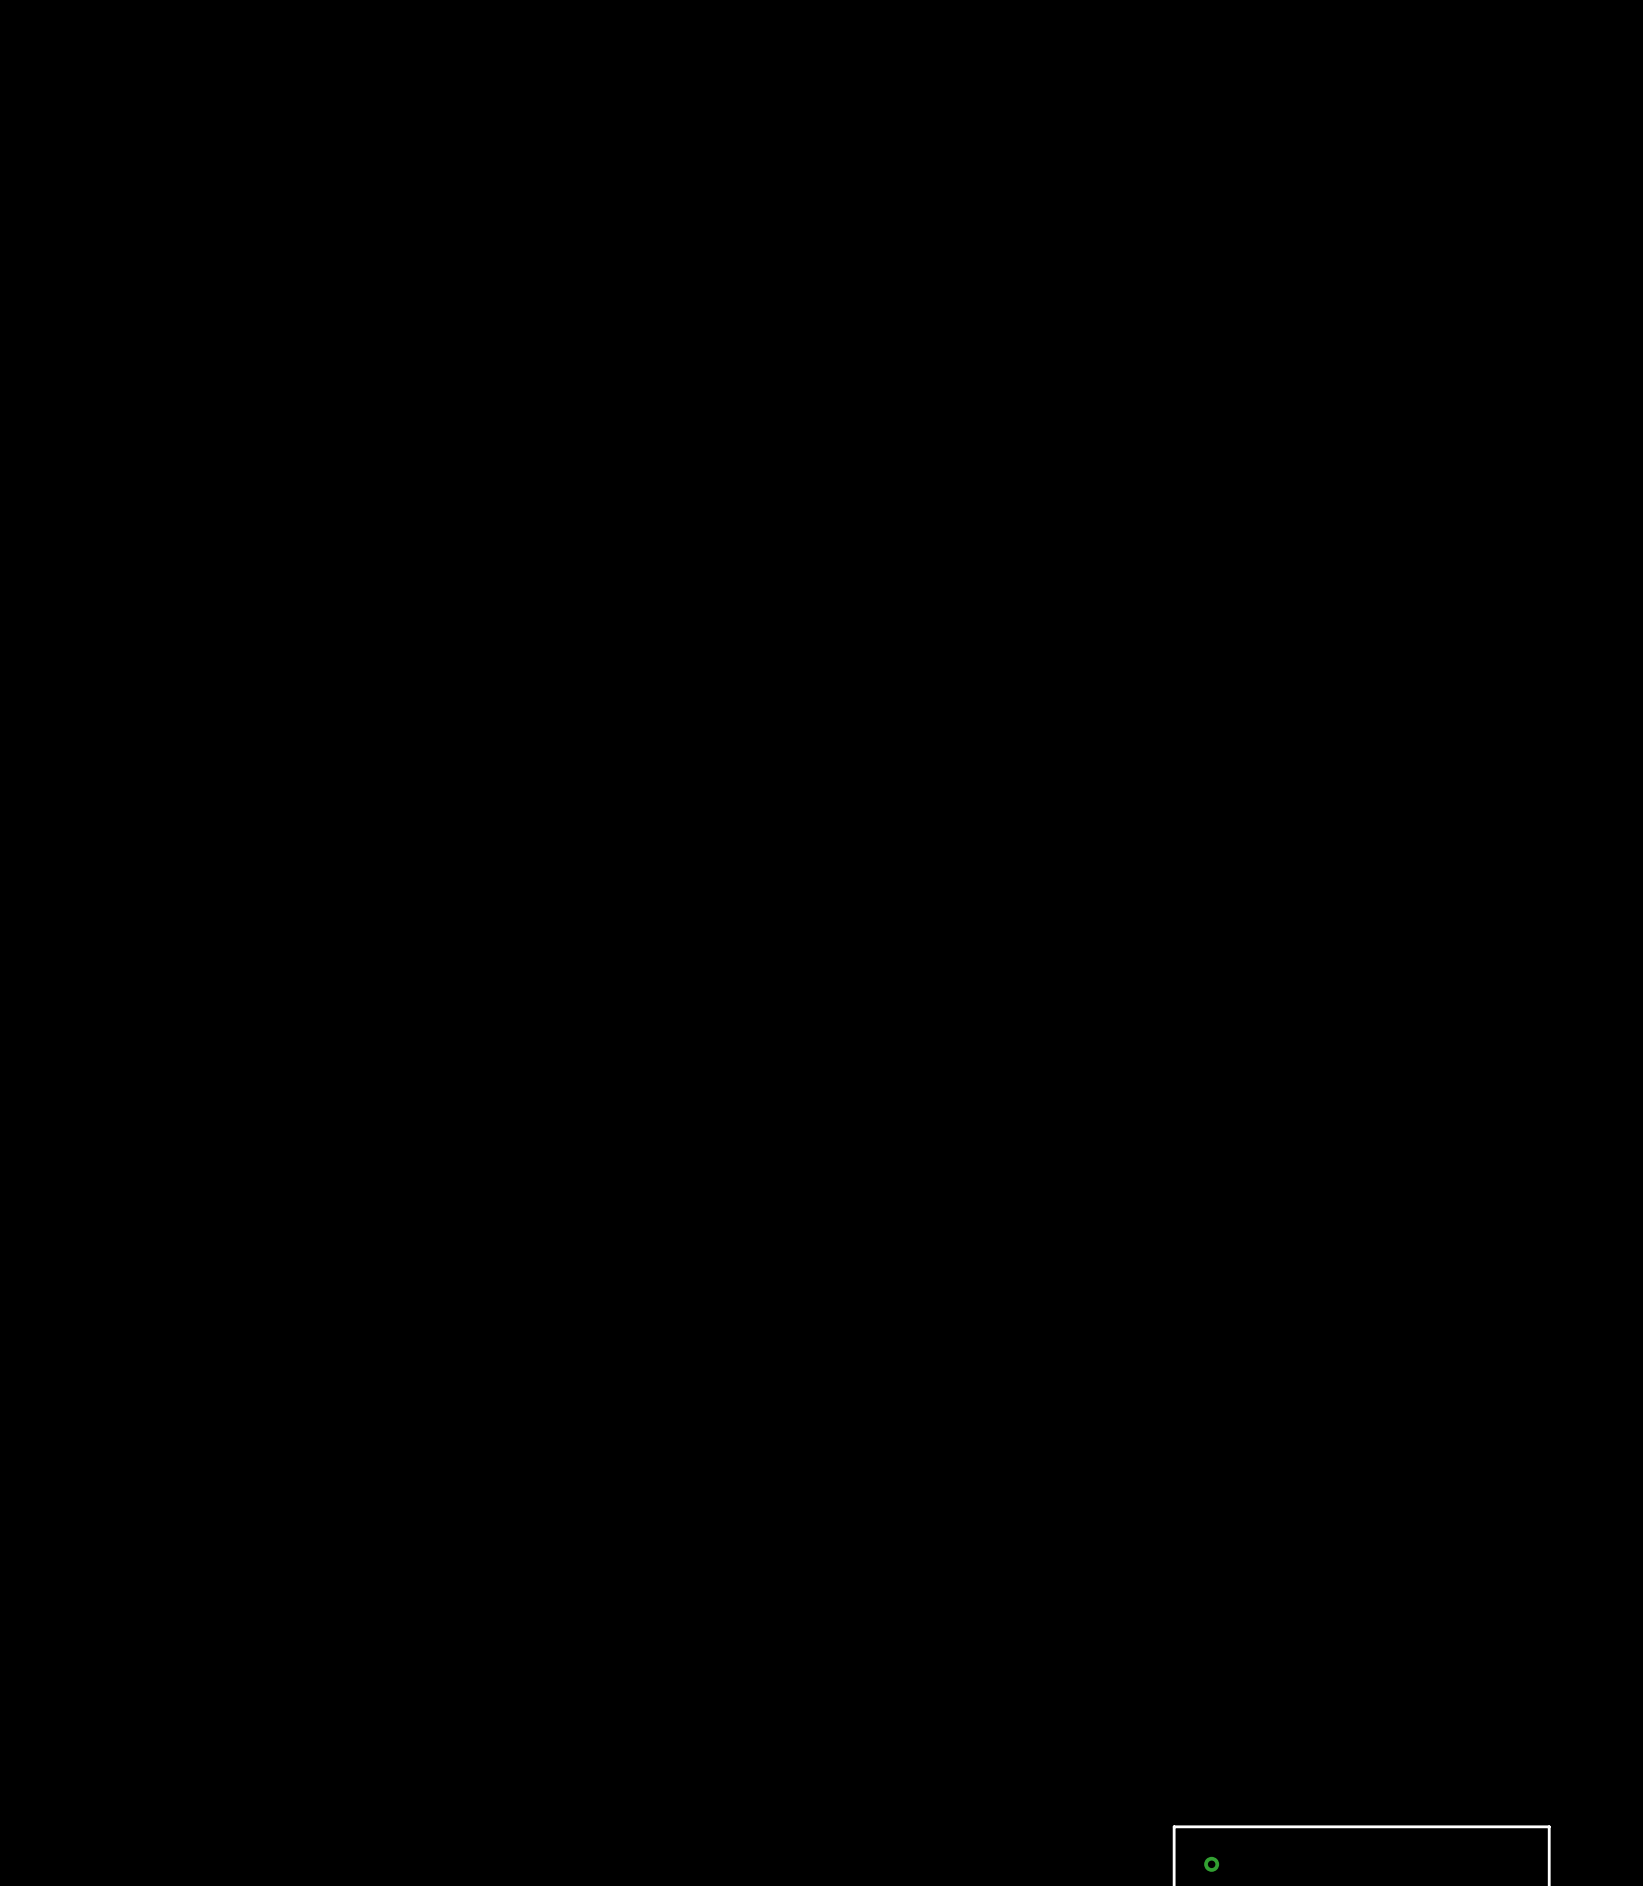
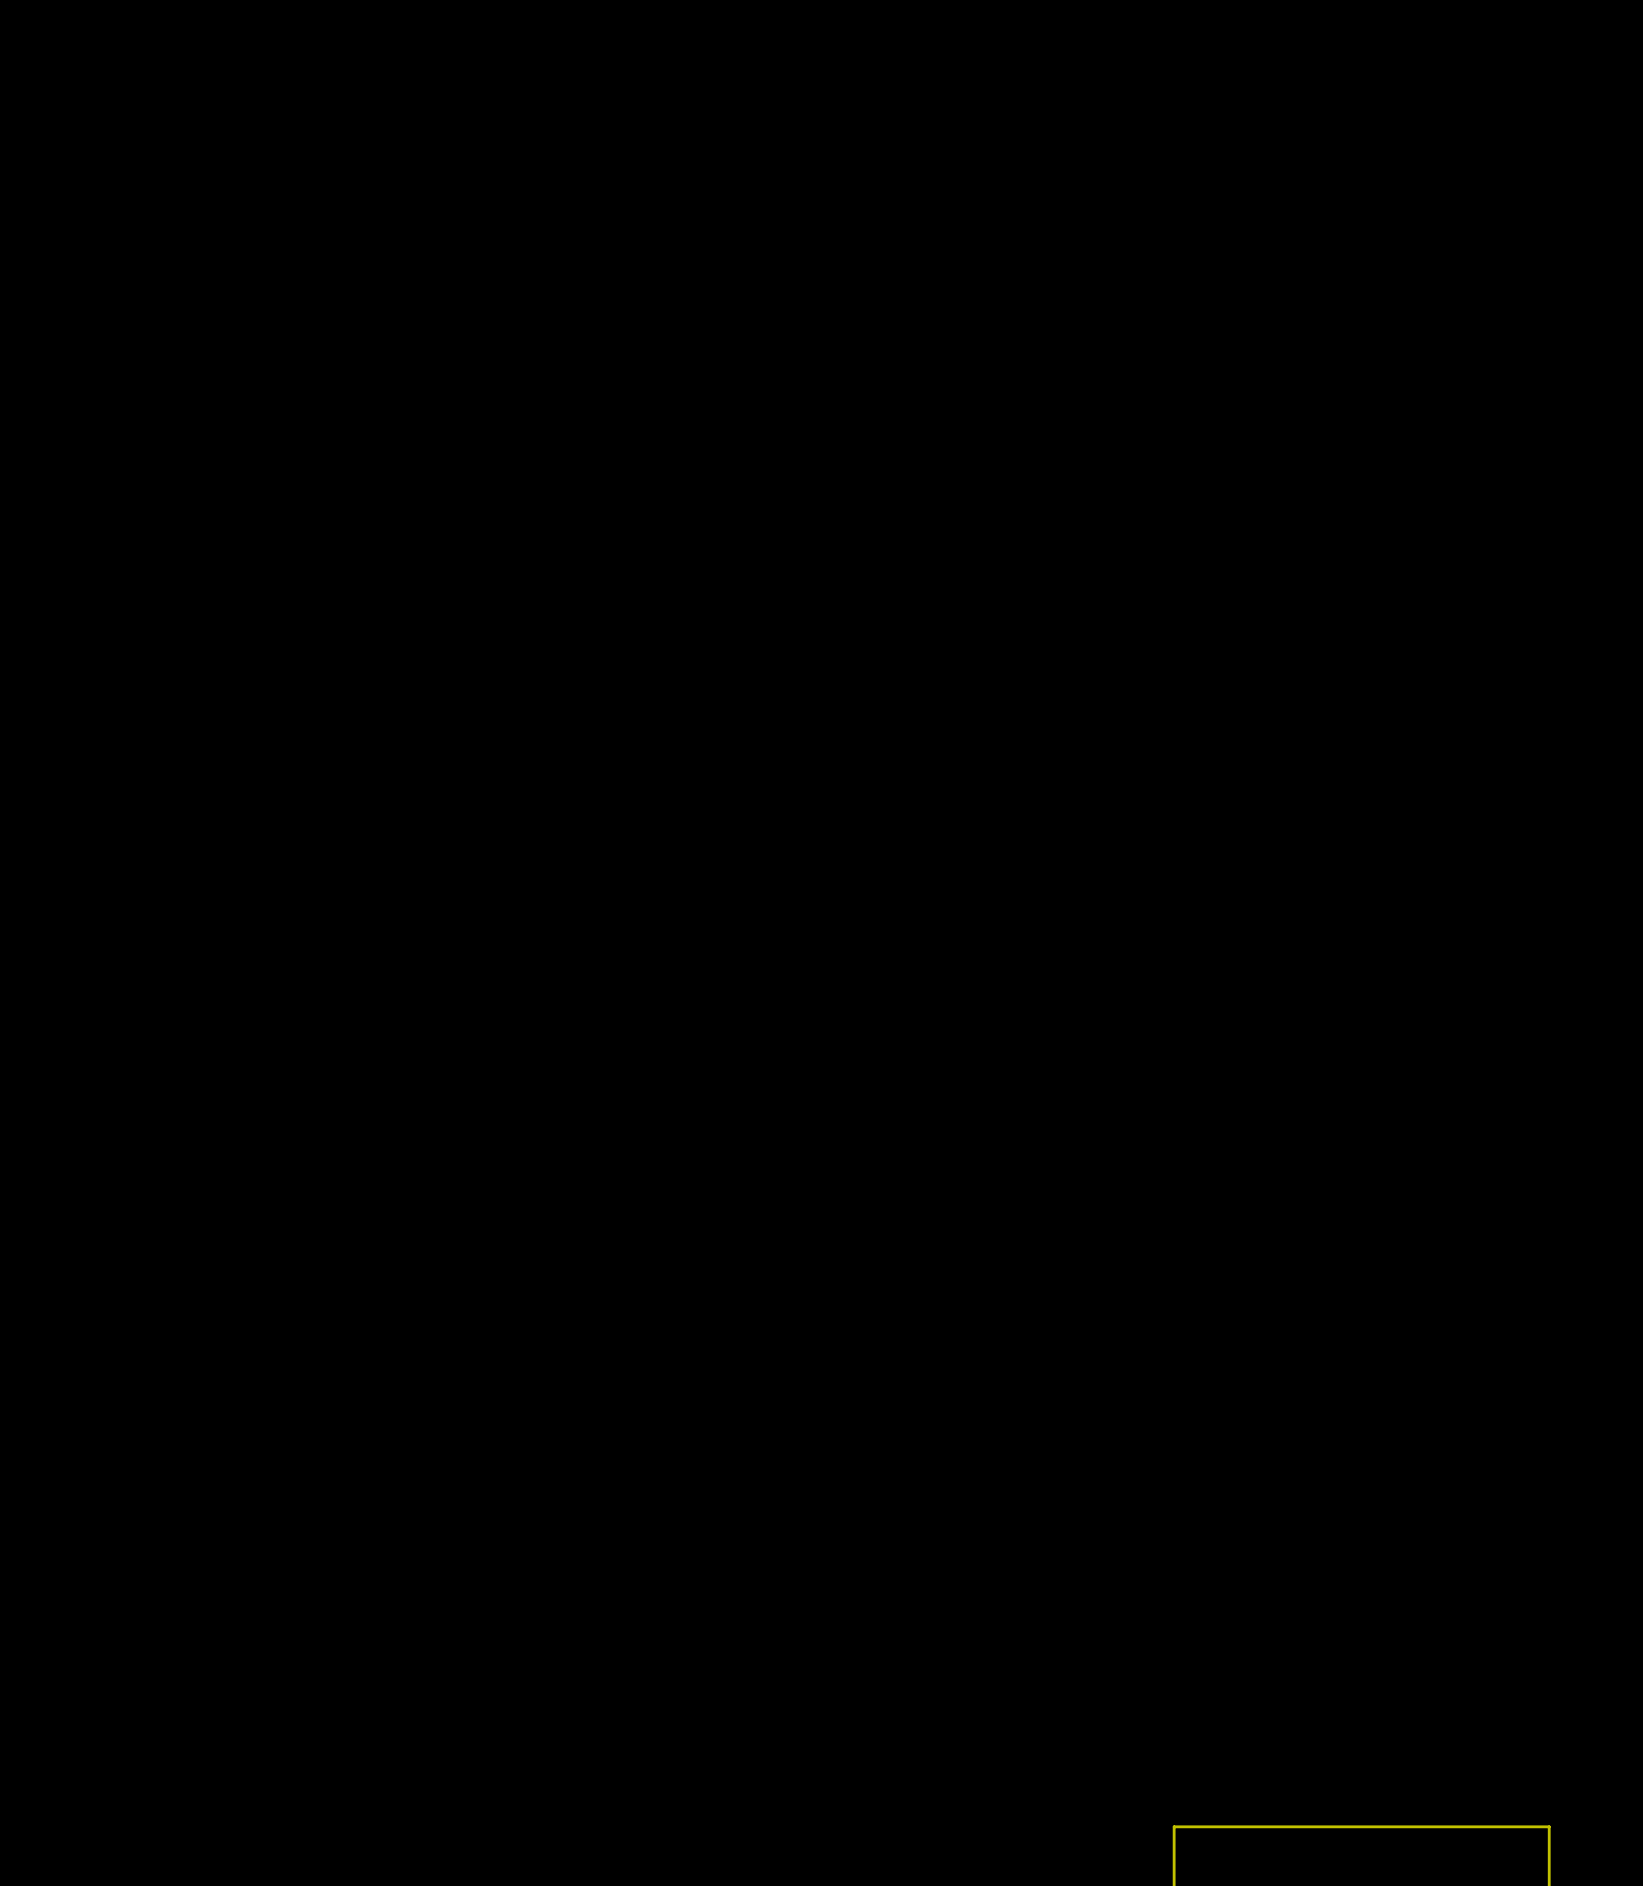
via: (1211, 1864) -> none

